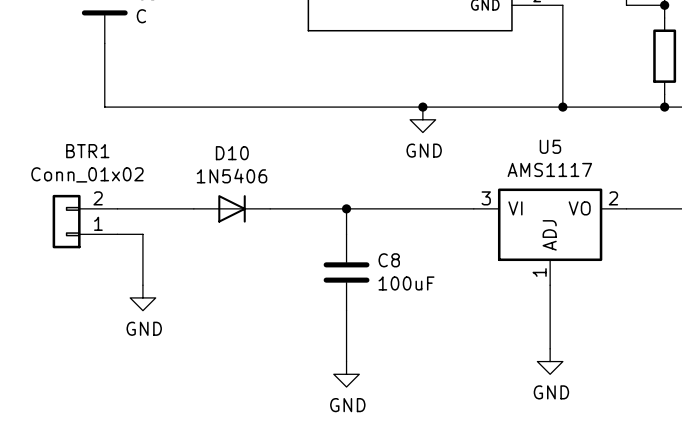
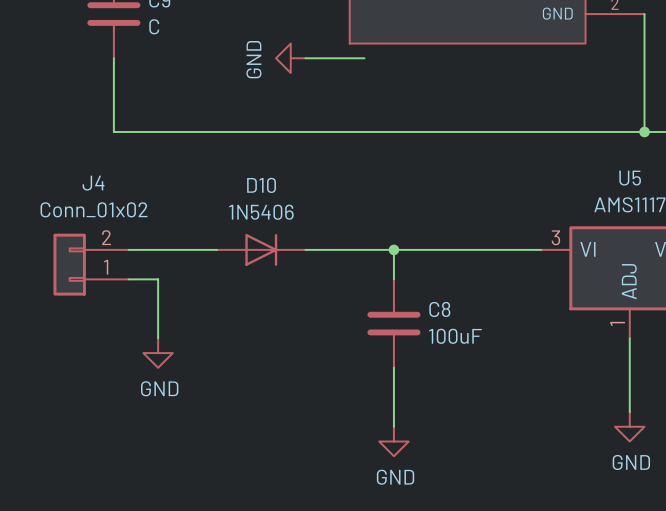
wire: none -> (305, 58) (364, 58)
junction: (422, 107) -> none
power symbol rotation: 0° (422, 119) -> 90° clockwise (290, 58)
power symbol position: GND (422, 119) -> GND (290, 58)
BTR1 name: BTR1 (87, 151) -> J4 (93, 183)

